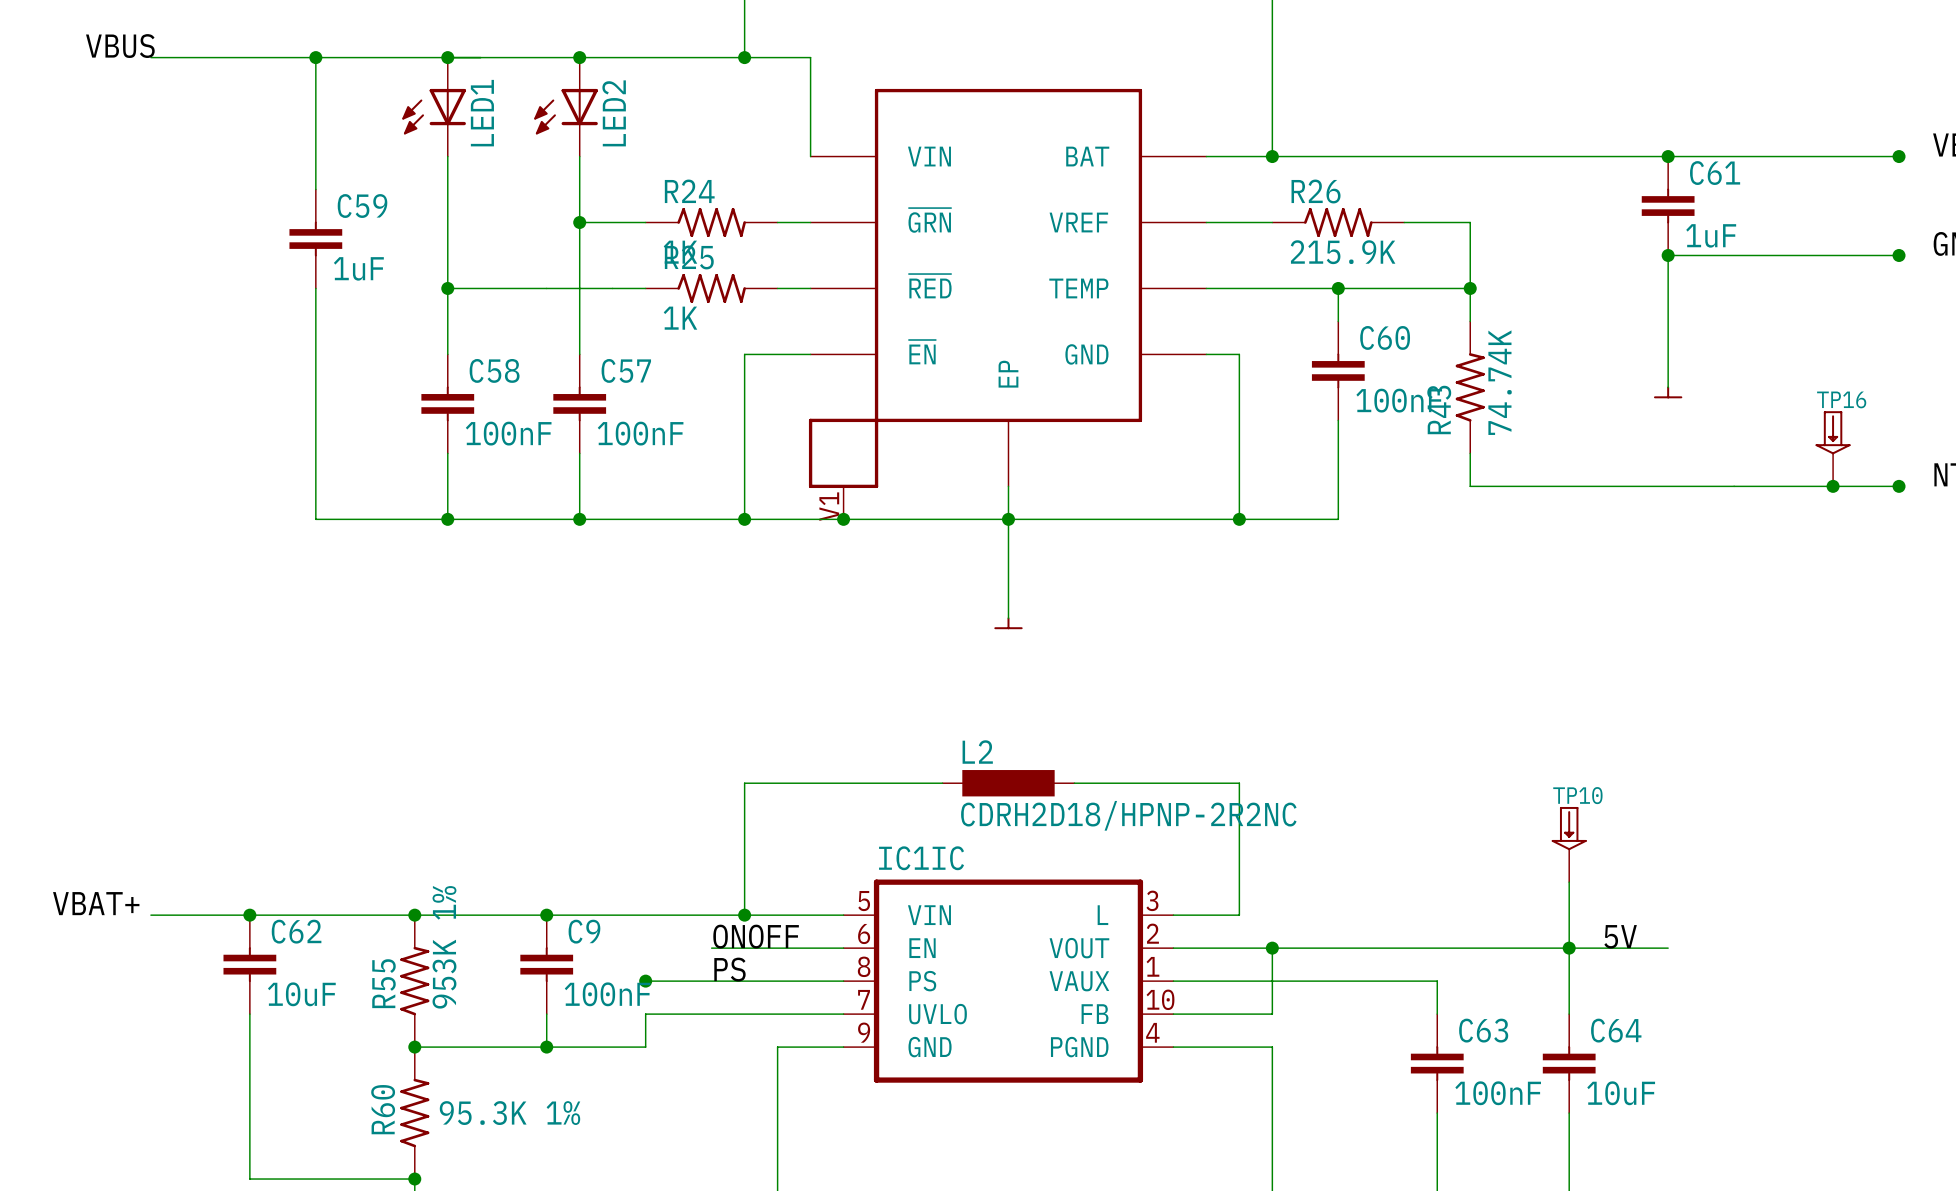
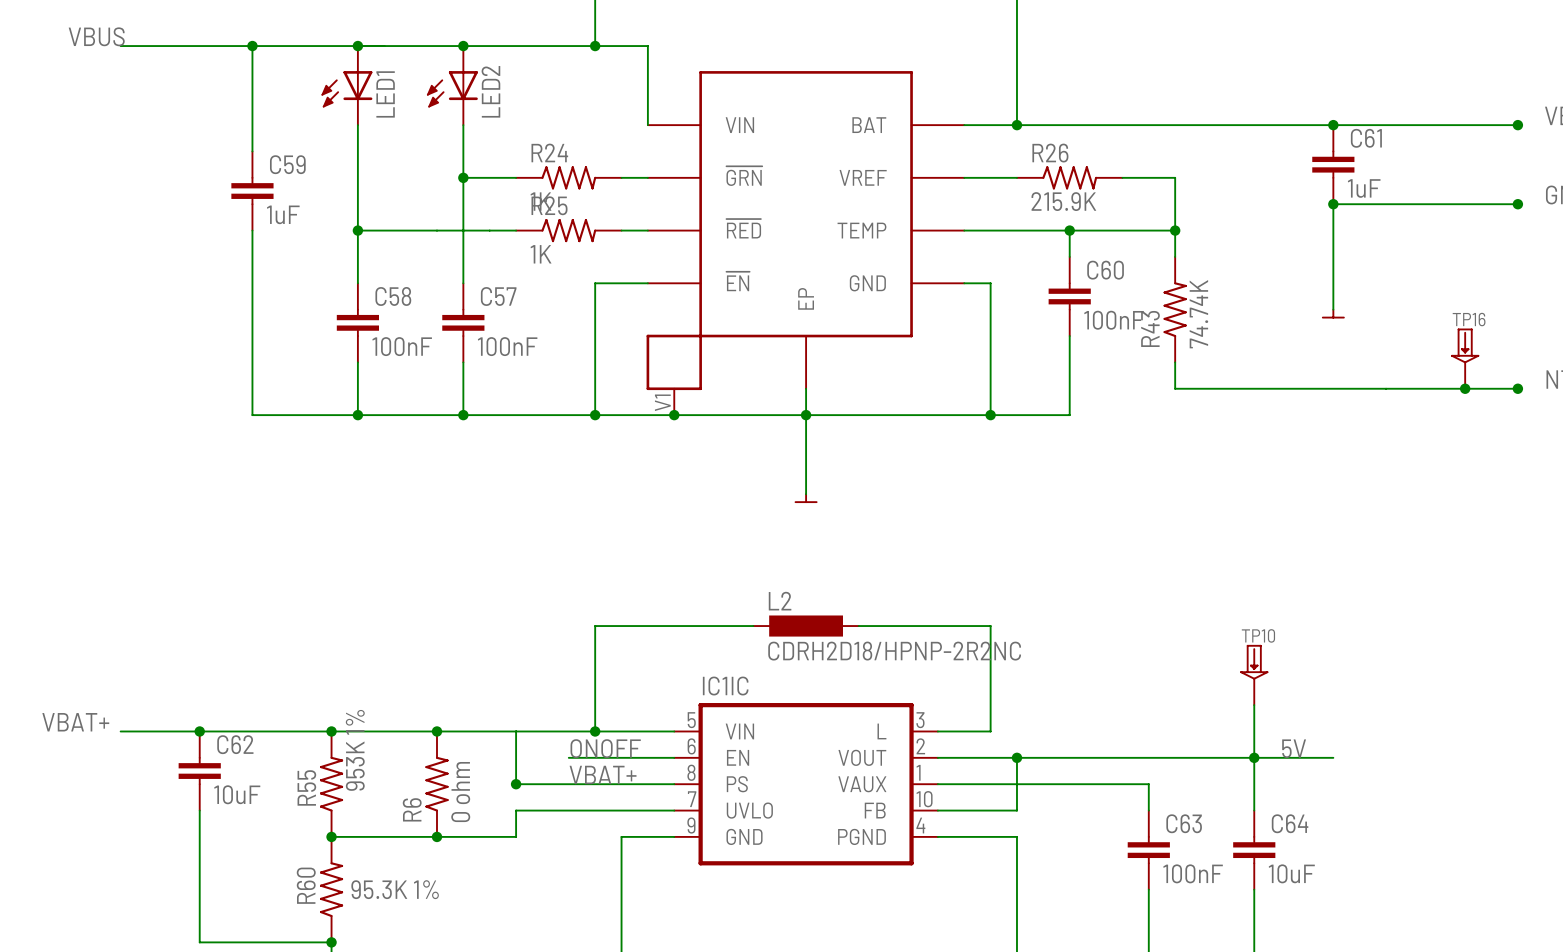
wire: none -> (516, 731) (516, 784)
C9: 100nF (546, 964) -> none
label: PS (729, 969) -> VBAT+ (603, 774)
R6: none -> 0 ohm (436, 784)

